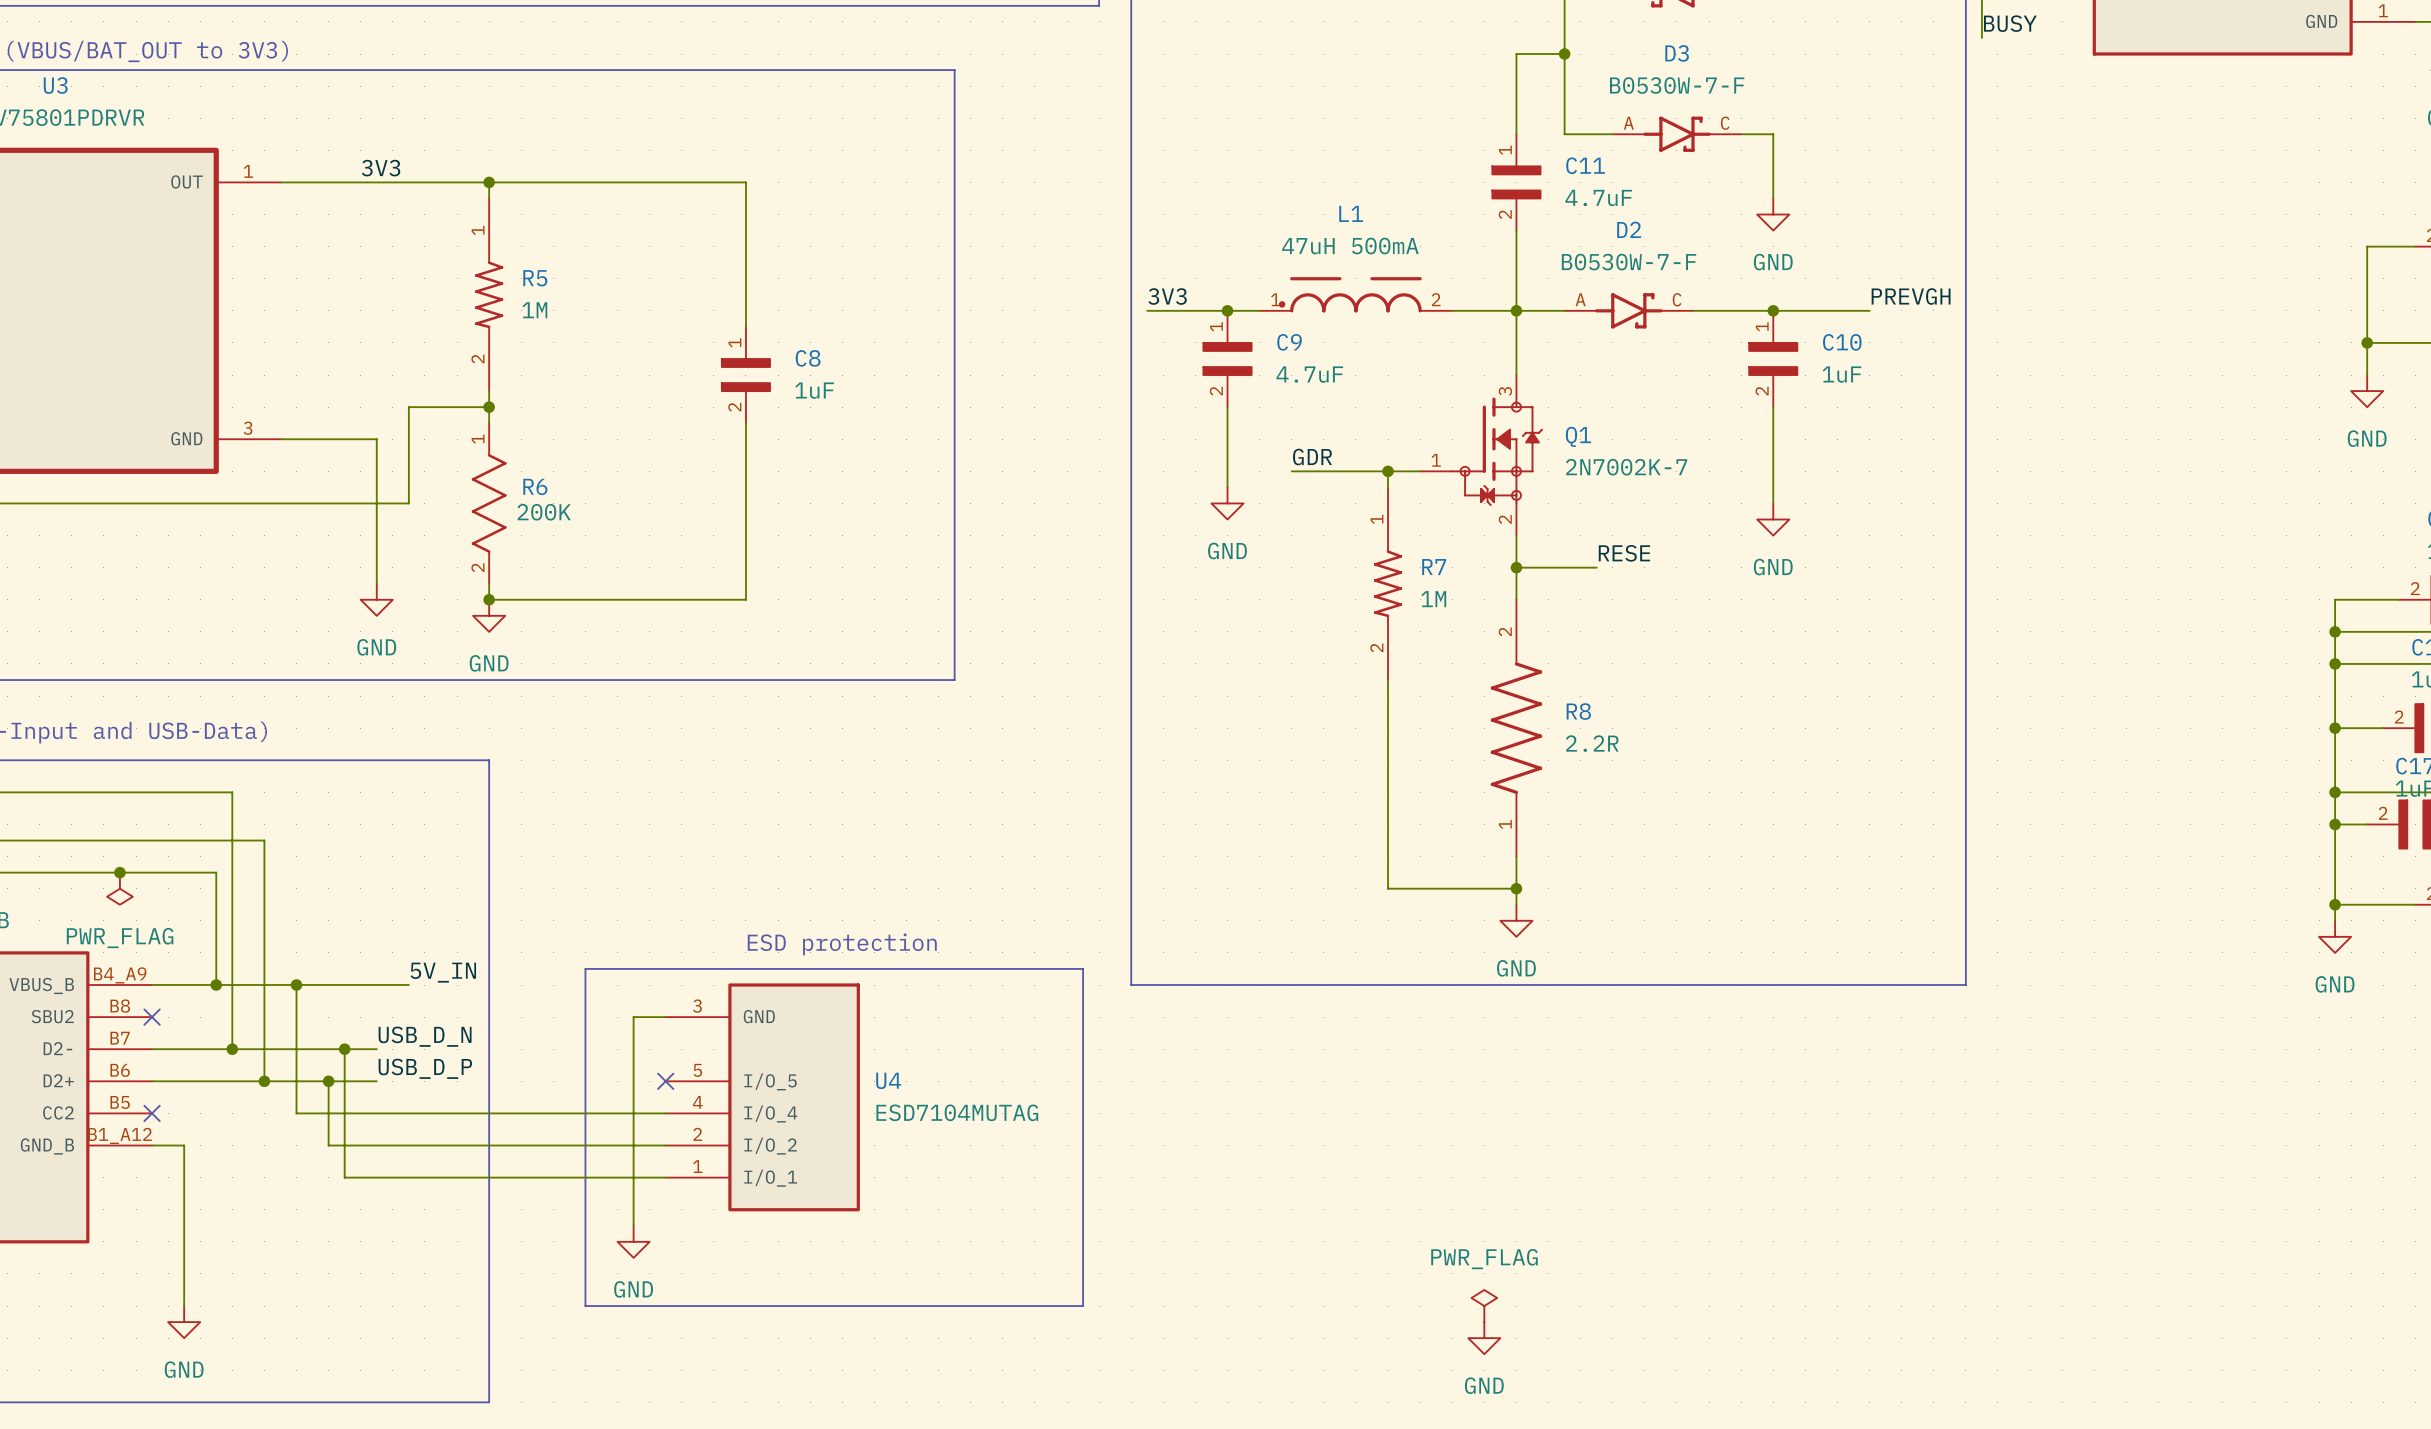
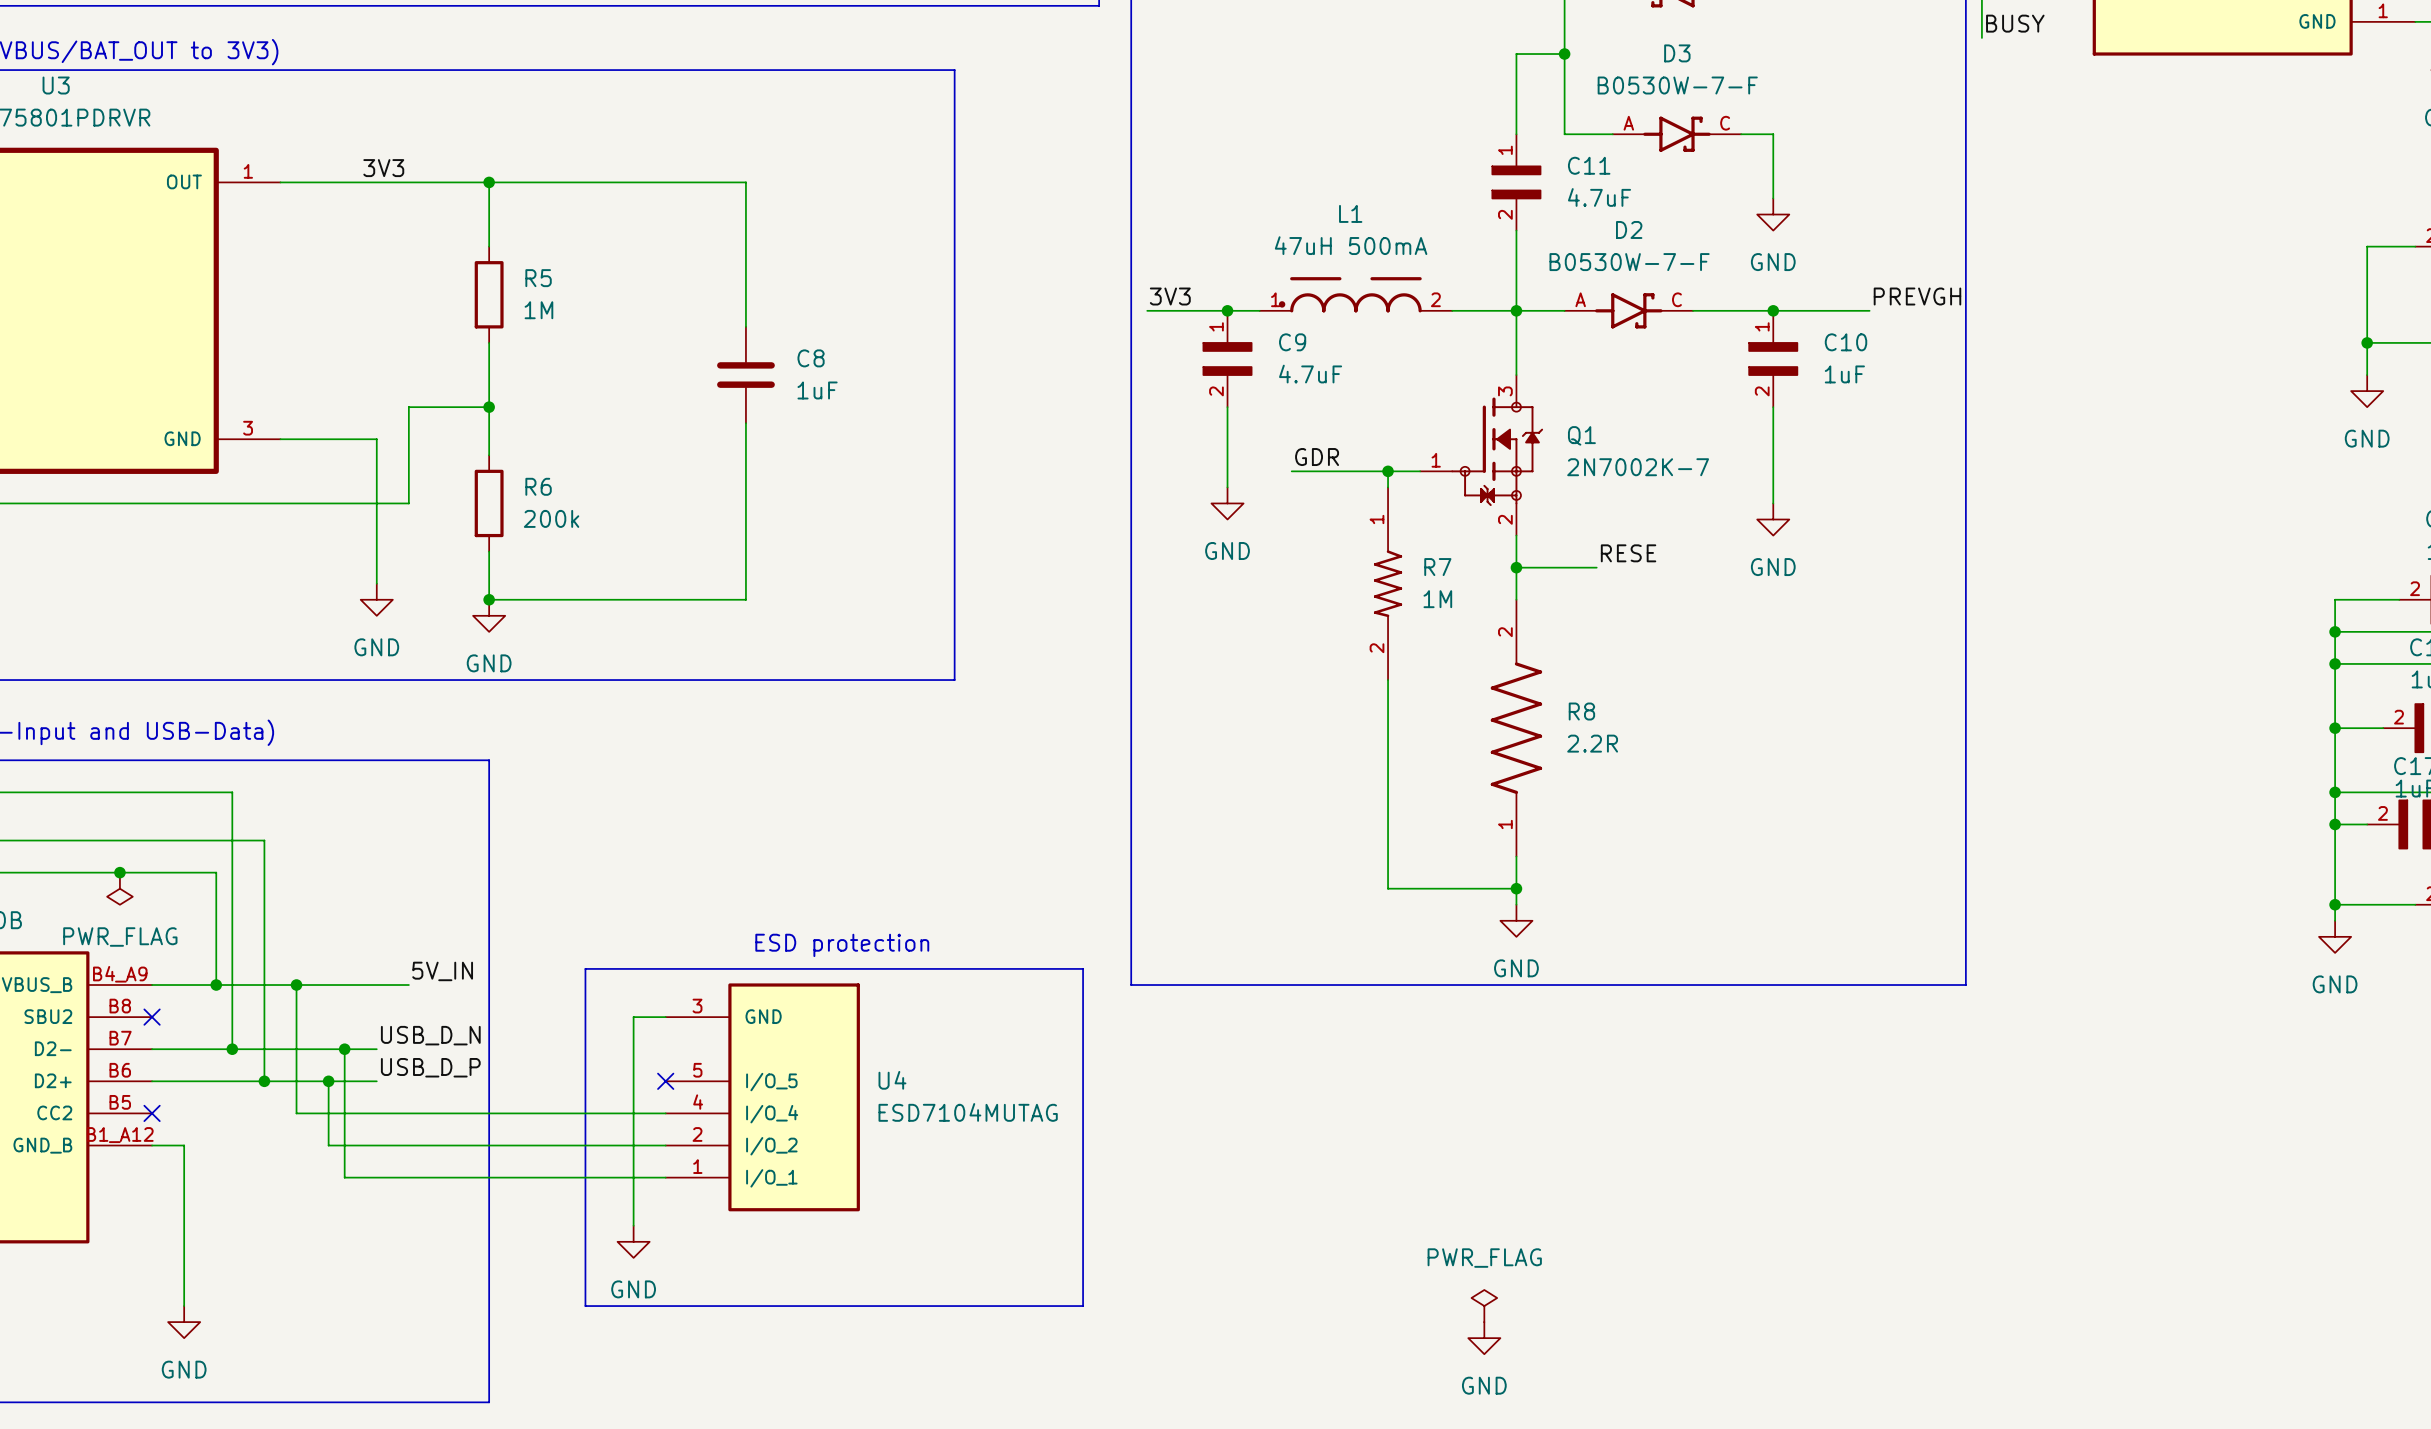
R5 symbol: [475, 198, 504, 392] -> [474, 246, 504, 343]
C8 symbol: [721, 326, 771, 424] -> [717, 326, 775, 424]
R6 symbol: [471, 423, 507, 584] -> [474, 455, 504, 552]
R6 value: 200K (544, 512) -> 200k (551, 518)

